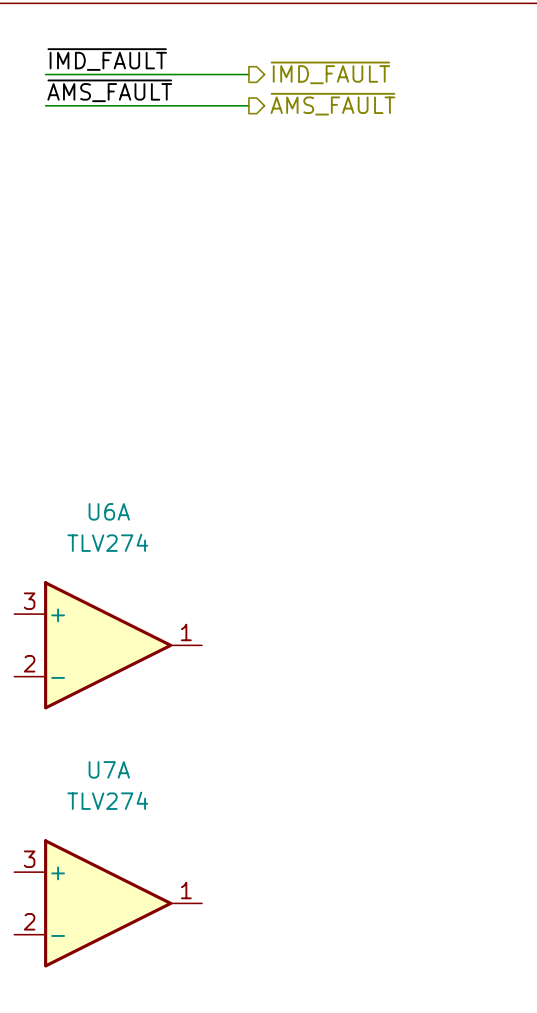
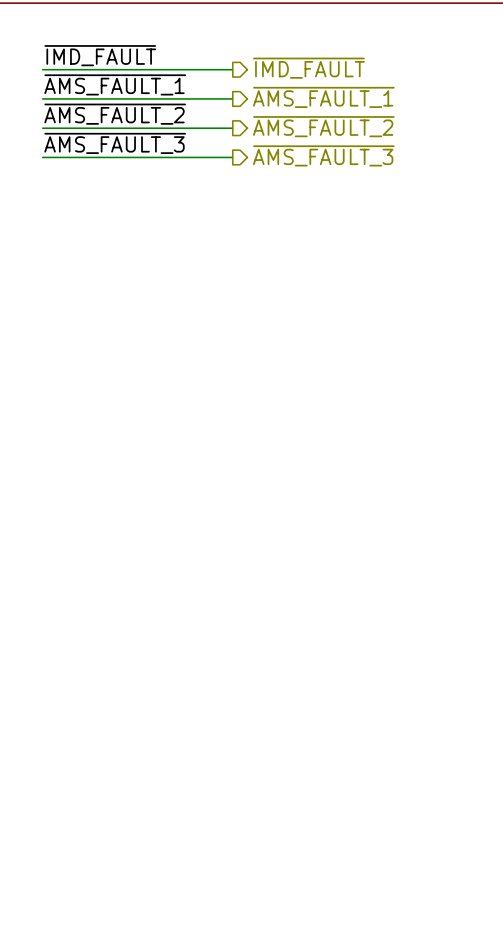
label: ~{AMS_FAULT} (109, 90) -> ~{AMS_FAULT_1} (115, 84)
hierarchical label: ~{AMS_FAULT} (332, 104) -> ~{AMS_FAULT_1} (323, 97)
label: none -> ~{AMS_FAULT_2} (115, 114)
hierarchical label: none -> ~{AMS_FAULT_2} (323, 126)
wire: none -> (42, 128) (232, 128)
label: none -> ~{AMS_FAULT_3} (115, 143)
hierarchical label: none -> ~{AMS_FAULT_3} (323, 155)
wire: none -> (42, 157) (232, 157)
U6A: TLV274 (108, 645) -> none
U7A: TLV274 (108, 903) -> none

